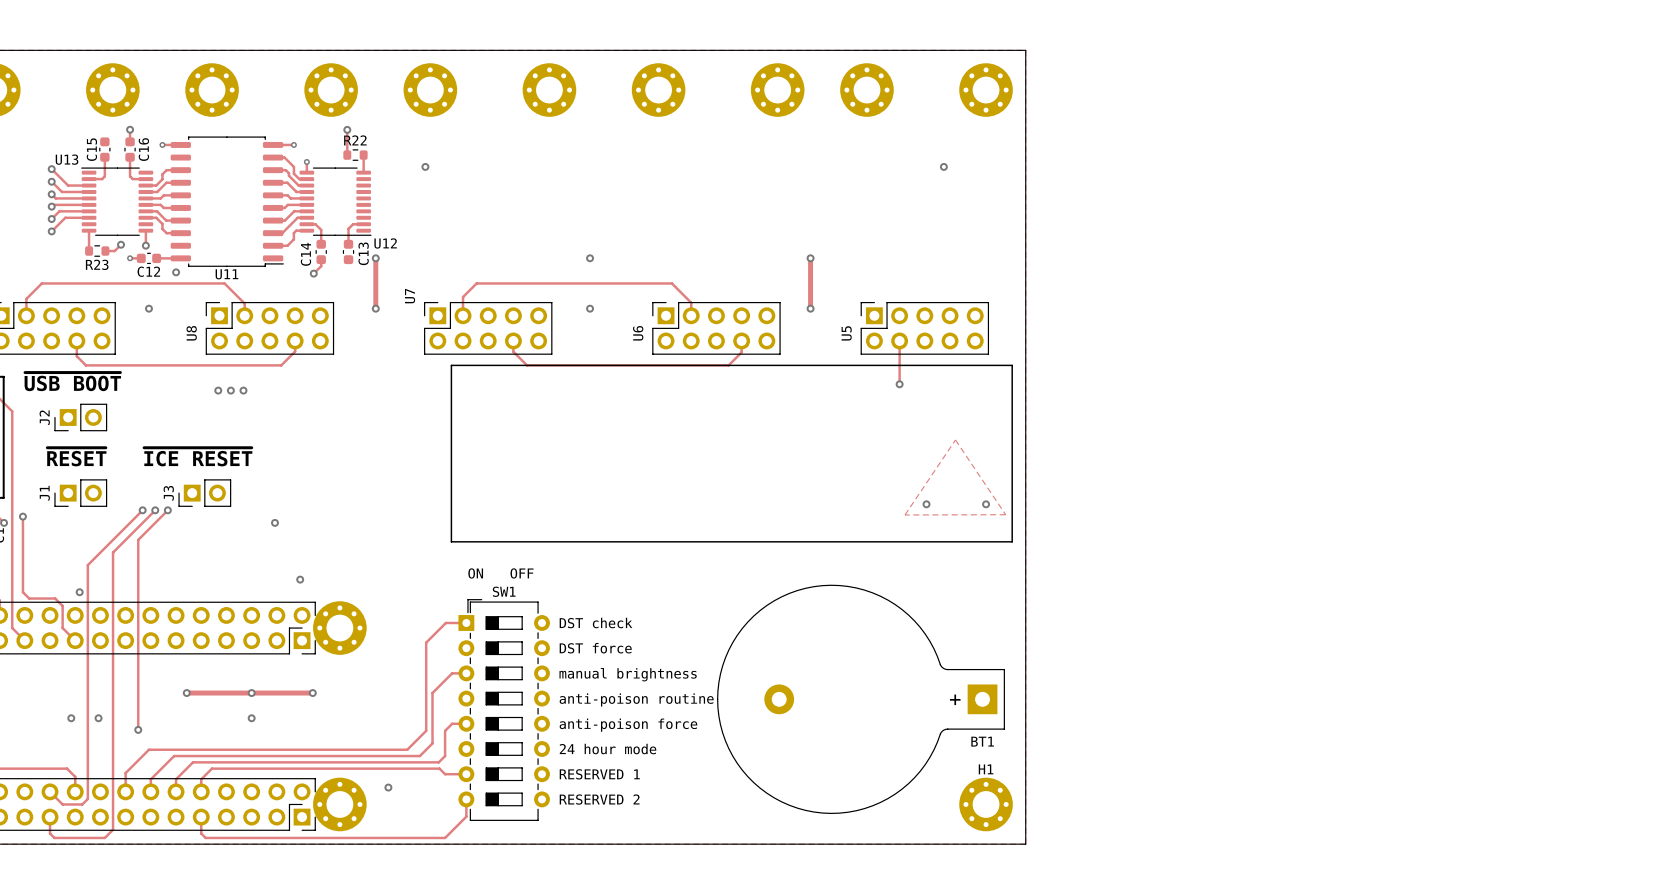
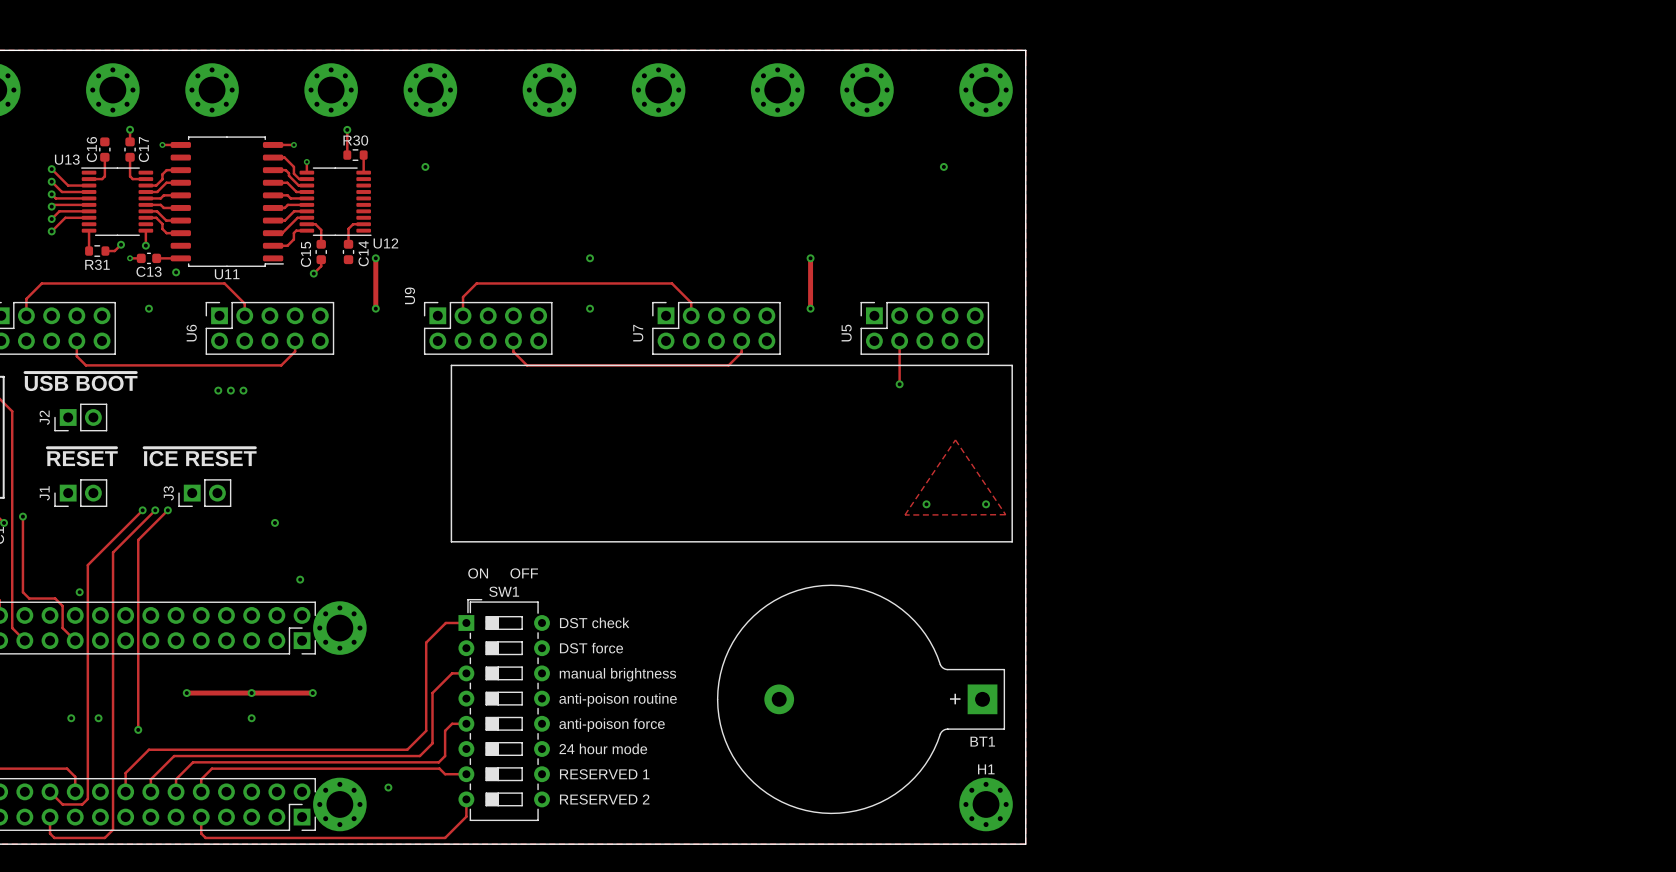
R22 name: R22 (355, 140) -> R30 (355, 140)
C15 name: C15 (91, 149) -> C16 (91, 149)
C16 name: C16 (143, 149) -> C17 (143, 149)
C13 name: C13 (363, 253) -> C14 (363, 253)
C14 name: C14 (305, 254) -> C15 (305, 254)
R23 name: R23 (97, 264) -> R31 (97, 264)
C12 name: C12 (148, 271) -> C13 (149, 271)
U7 name: U7 (410, 296) -> U9 (409, 295)
U8 name: U8 (191, 333) -> U6 (191, 333)
U6 name: U6 (638, 333) -> U7 (638, 333)

